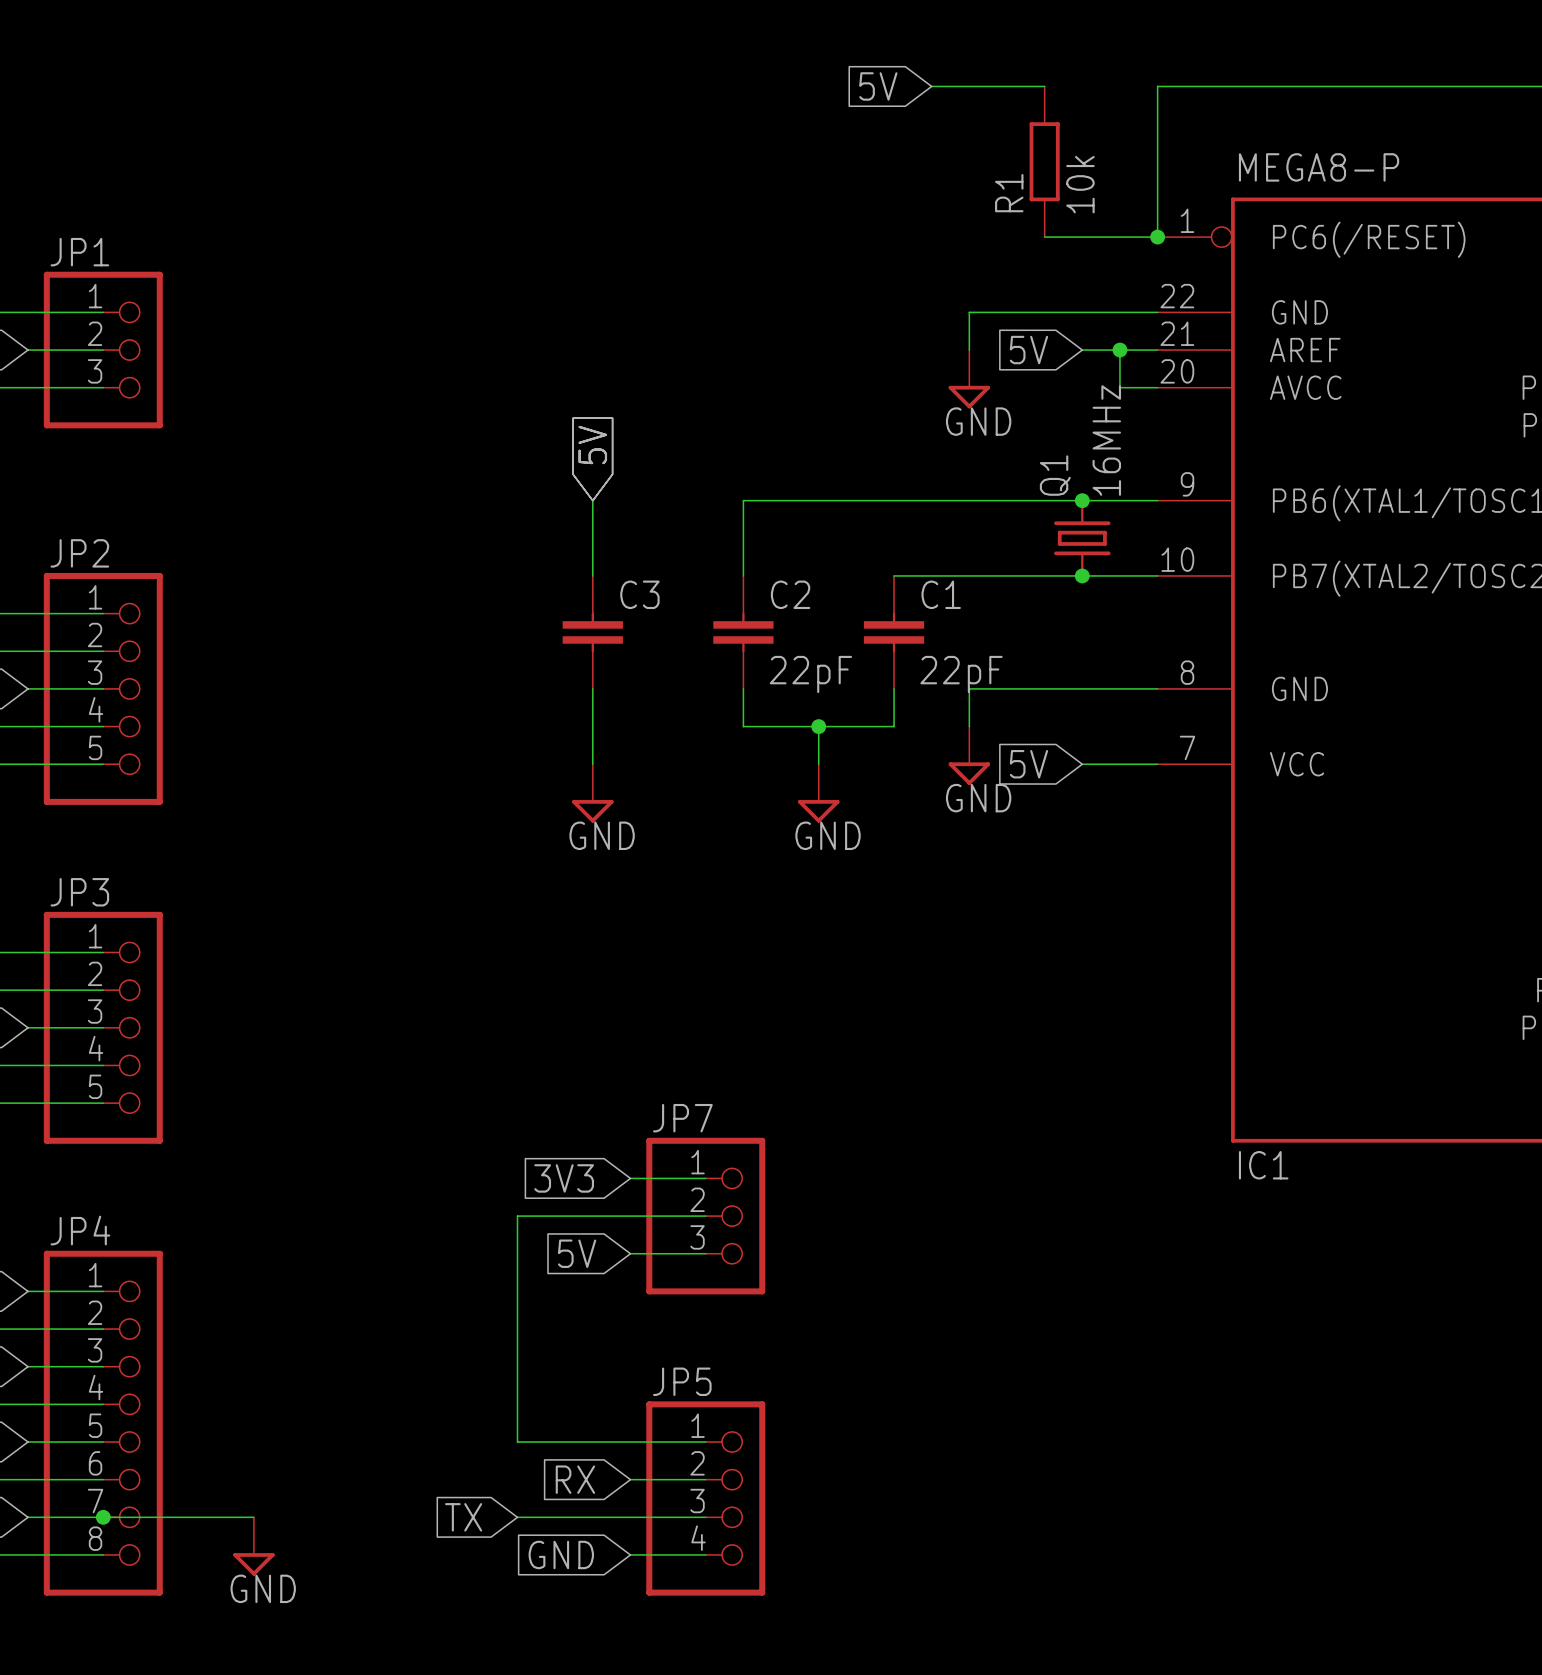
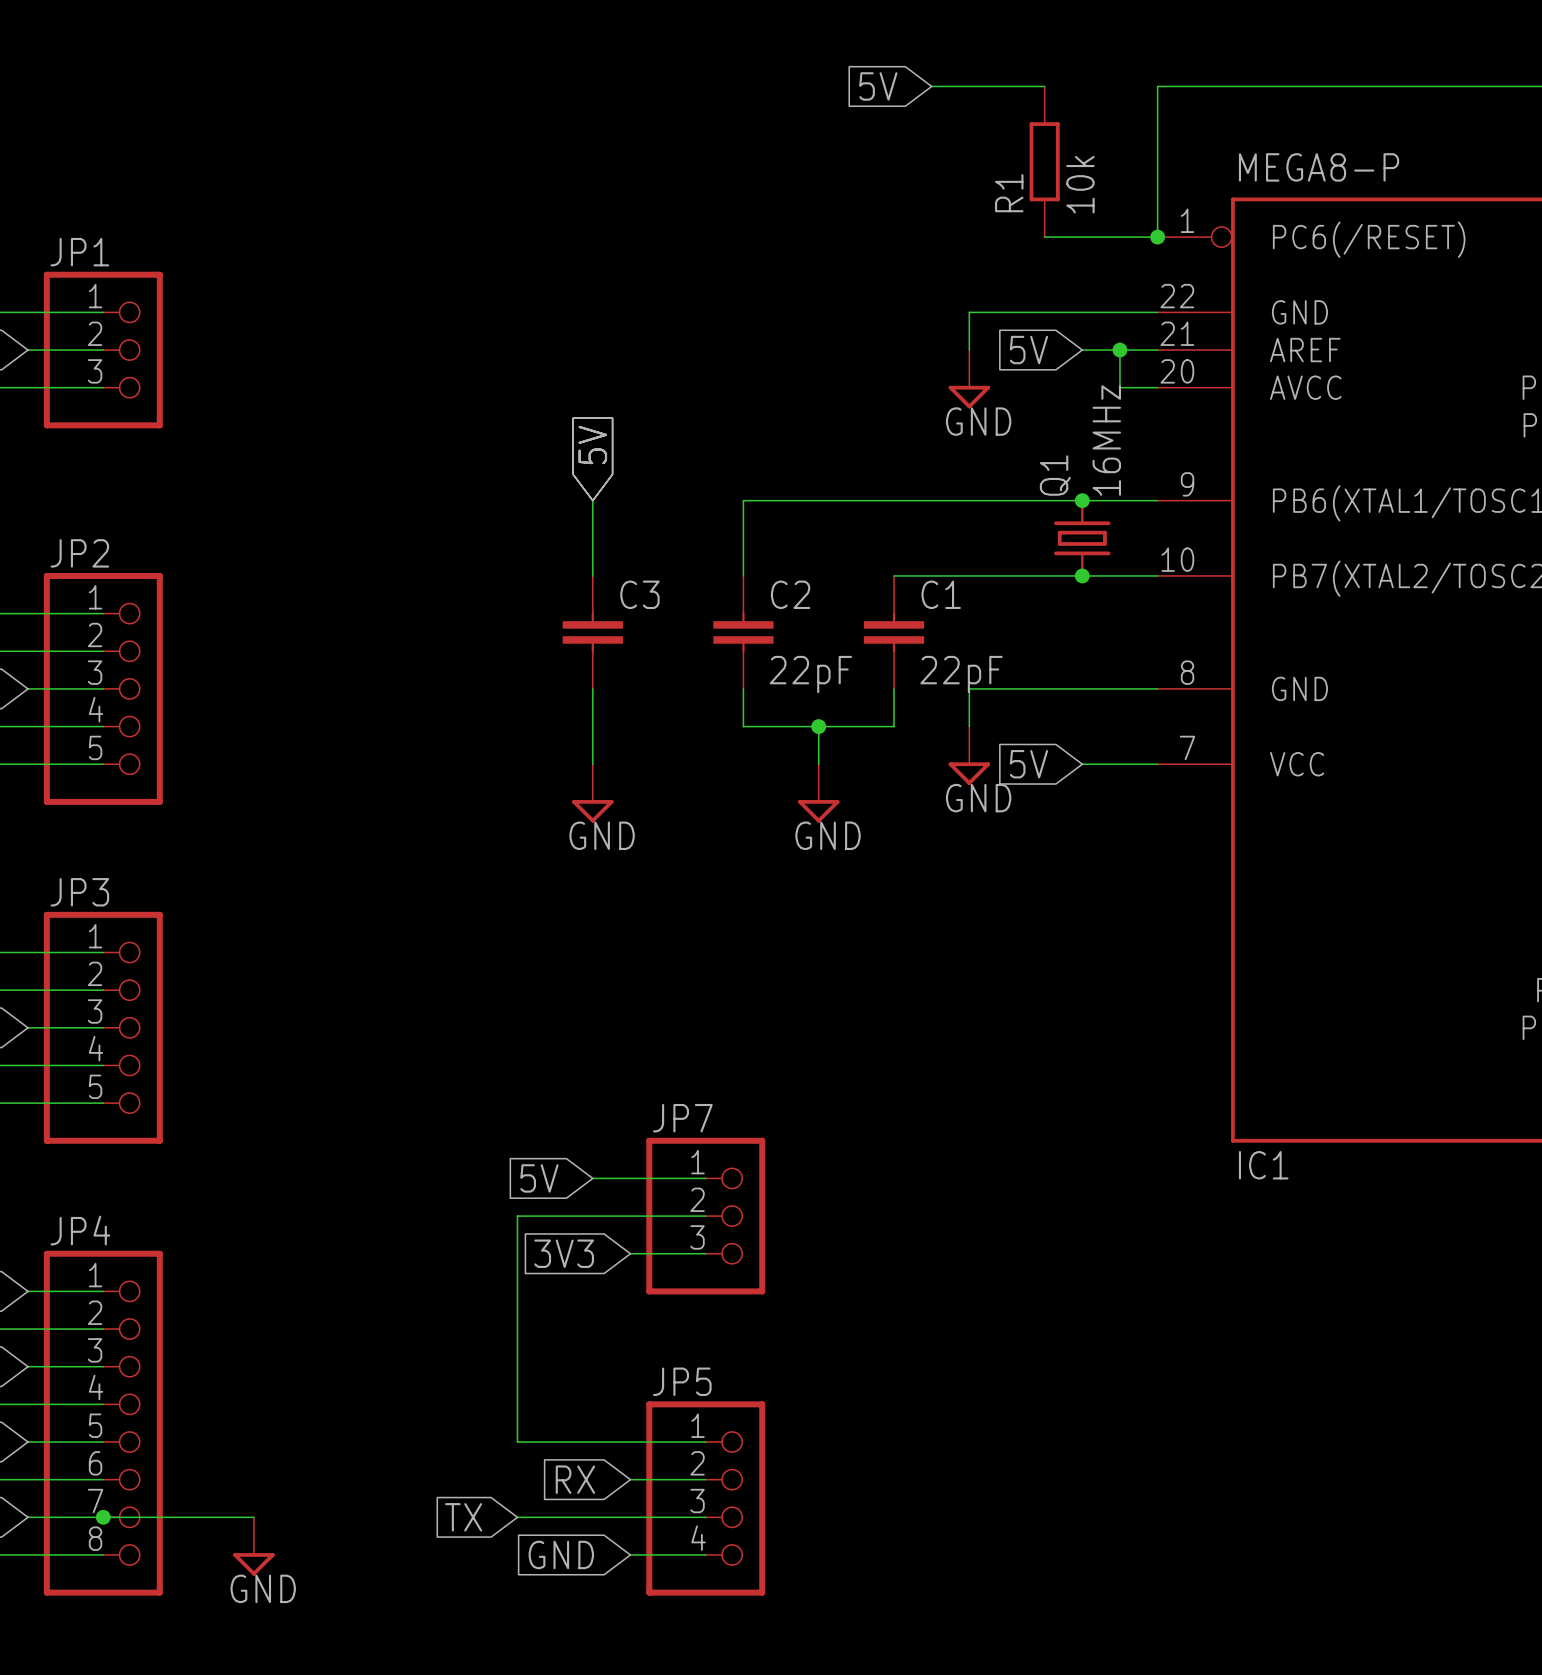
global label: none -> 5V (539, 1178)
global label: 3V3 (564, 1178) -> none
wire: none -> (592, 1178) (630, 1178)
global label: 5V (577, 1253) -> 3V3 (564, 1253)

